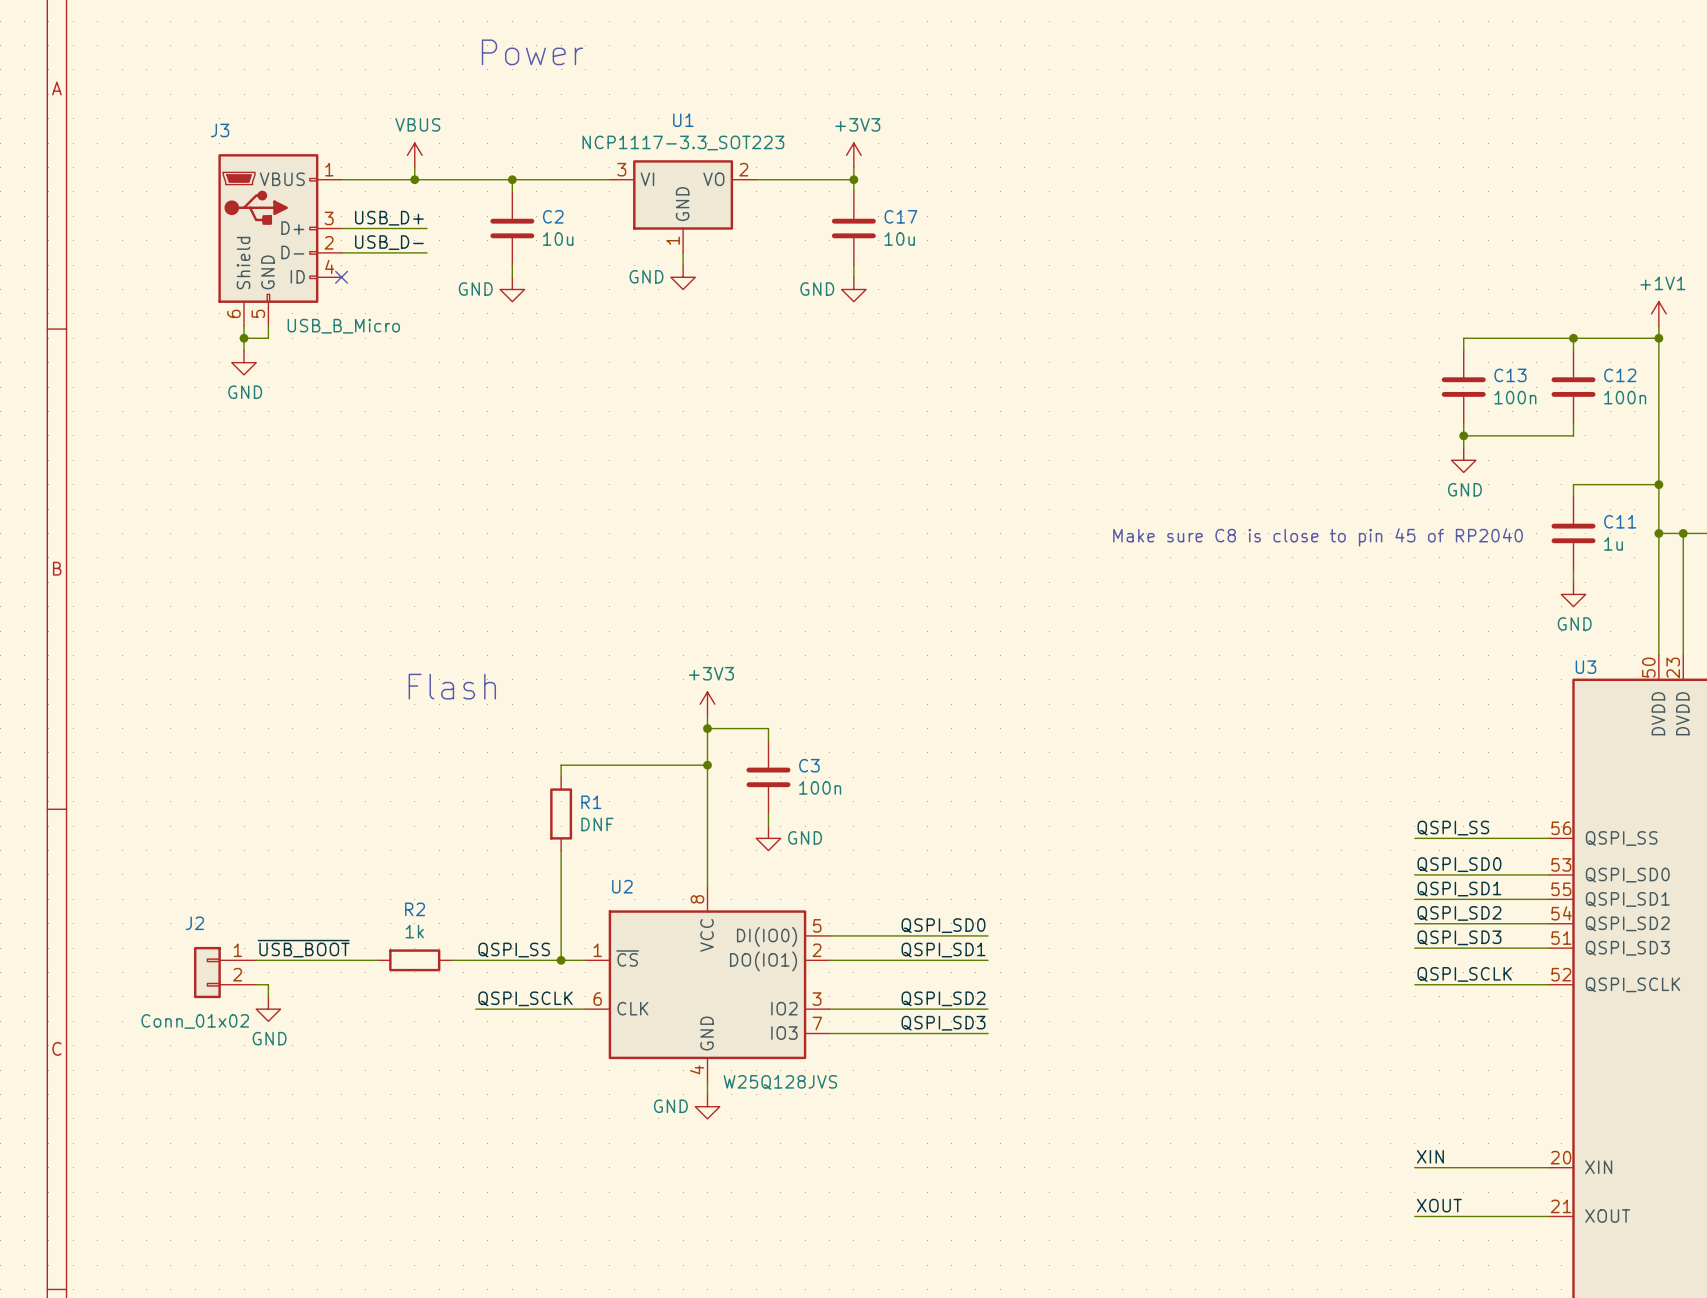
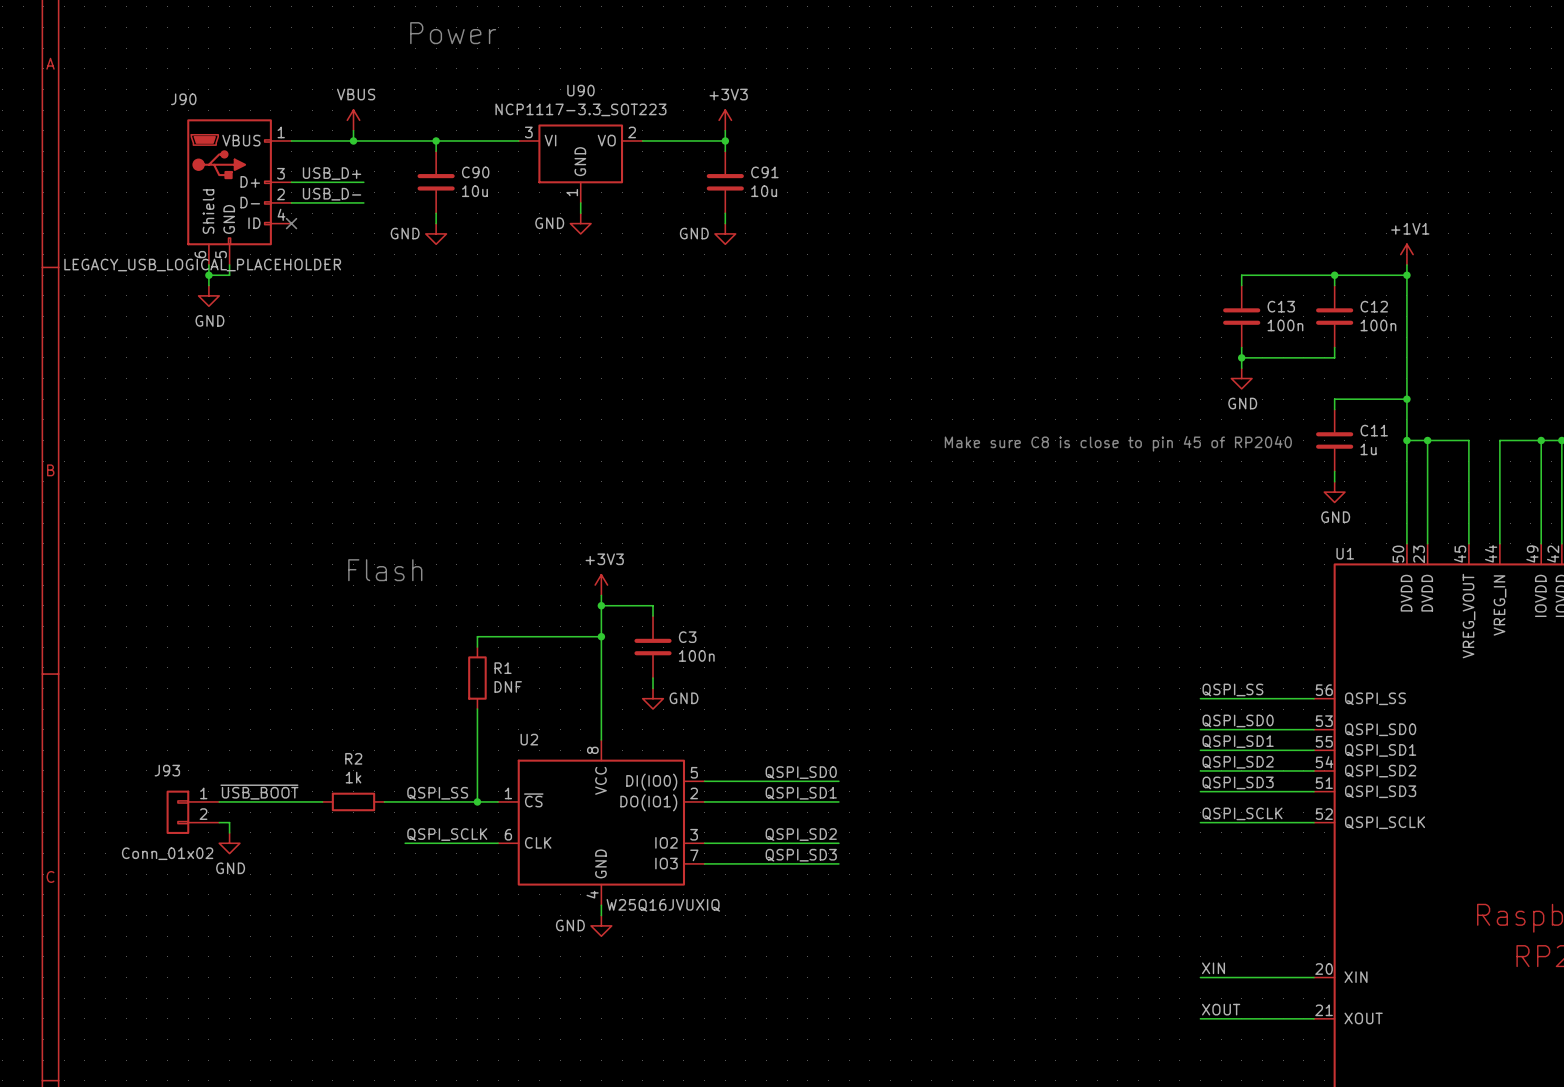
U1 name: U1 (683, 120) -> U90 (580, 90)
J3 name: J3 (220, 130) -> J90 (183, 99)
C2 name: C2 (553, 216) -> C90 (475, 172)
C17 name: C17 (900, 216) -> C91 (764, 172)
J3 value: USB_B_Micro (343, 326) -> LEGACY_USB_LOGICAL_PLACEHOLDER (202, 265)
U3 name: U3 (1585, 667) -> U1 (1345, 553)
J2 name: J2 (194, 923) -> J93 (167, 770)
U2 value: W25Q128JVS (780, 1082) -> W25Q16JVUXIQ (663, 905)

